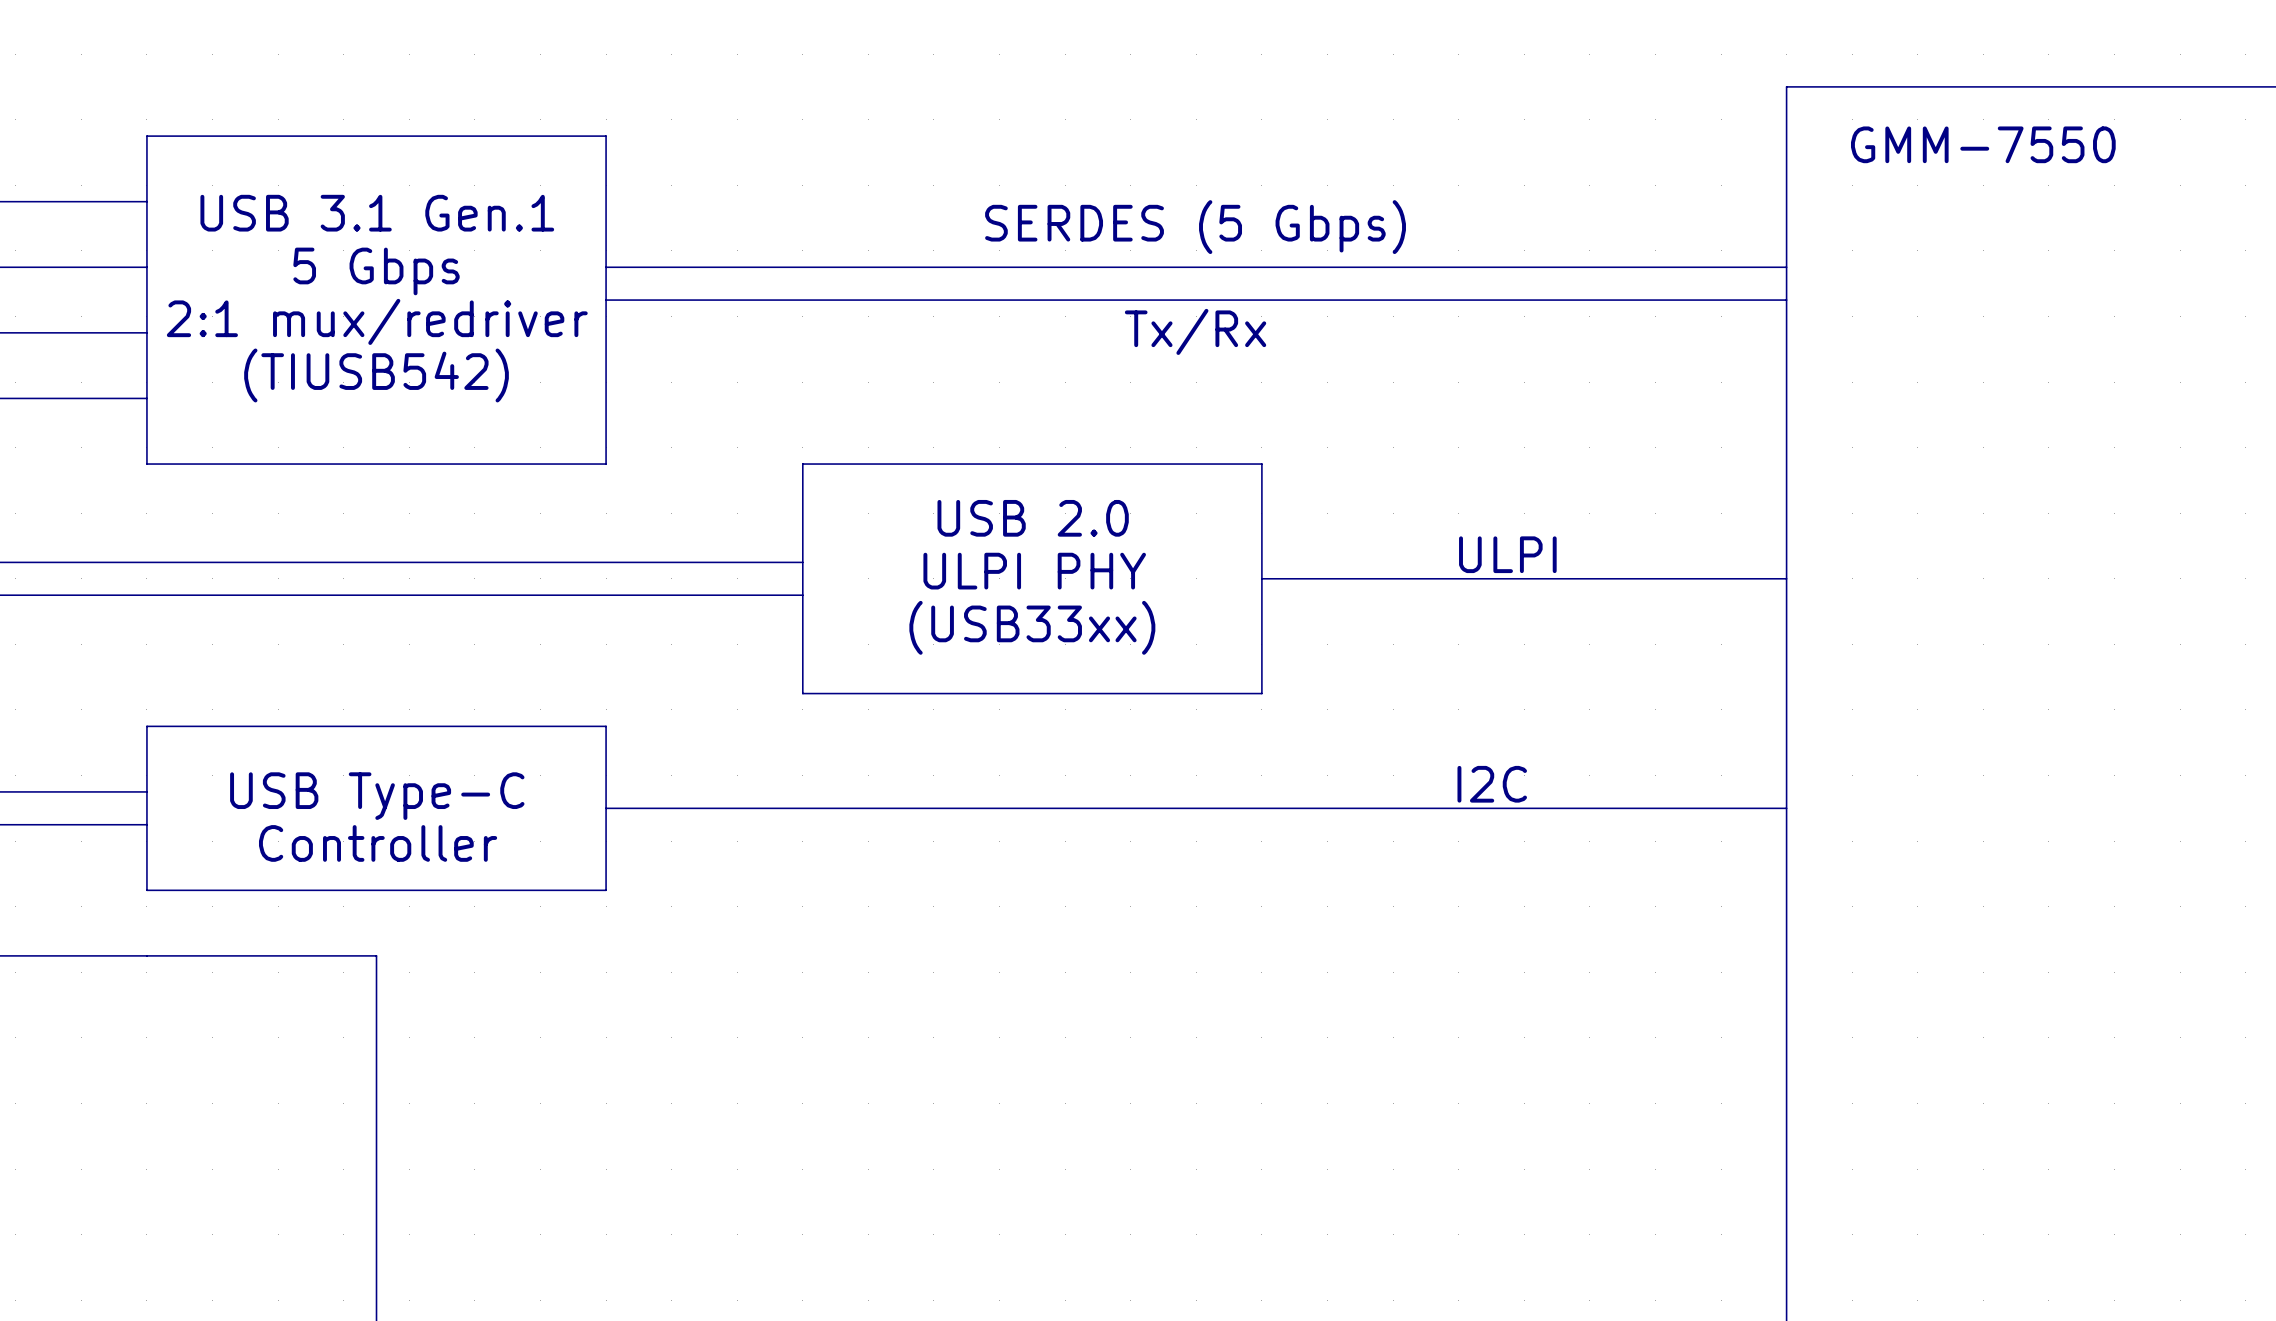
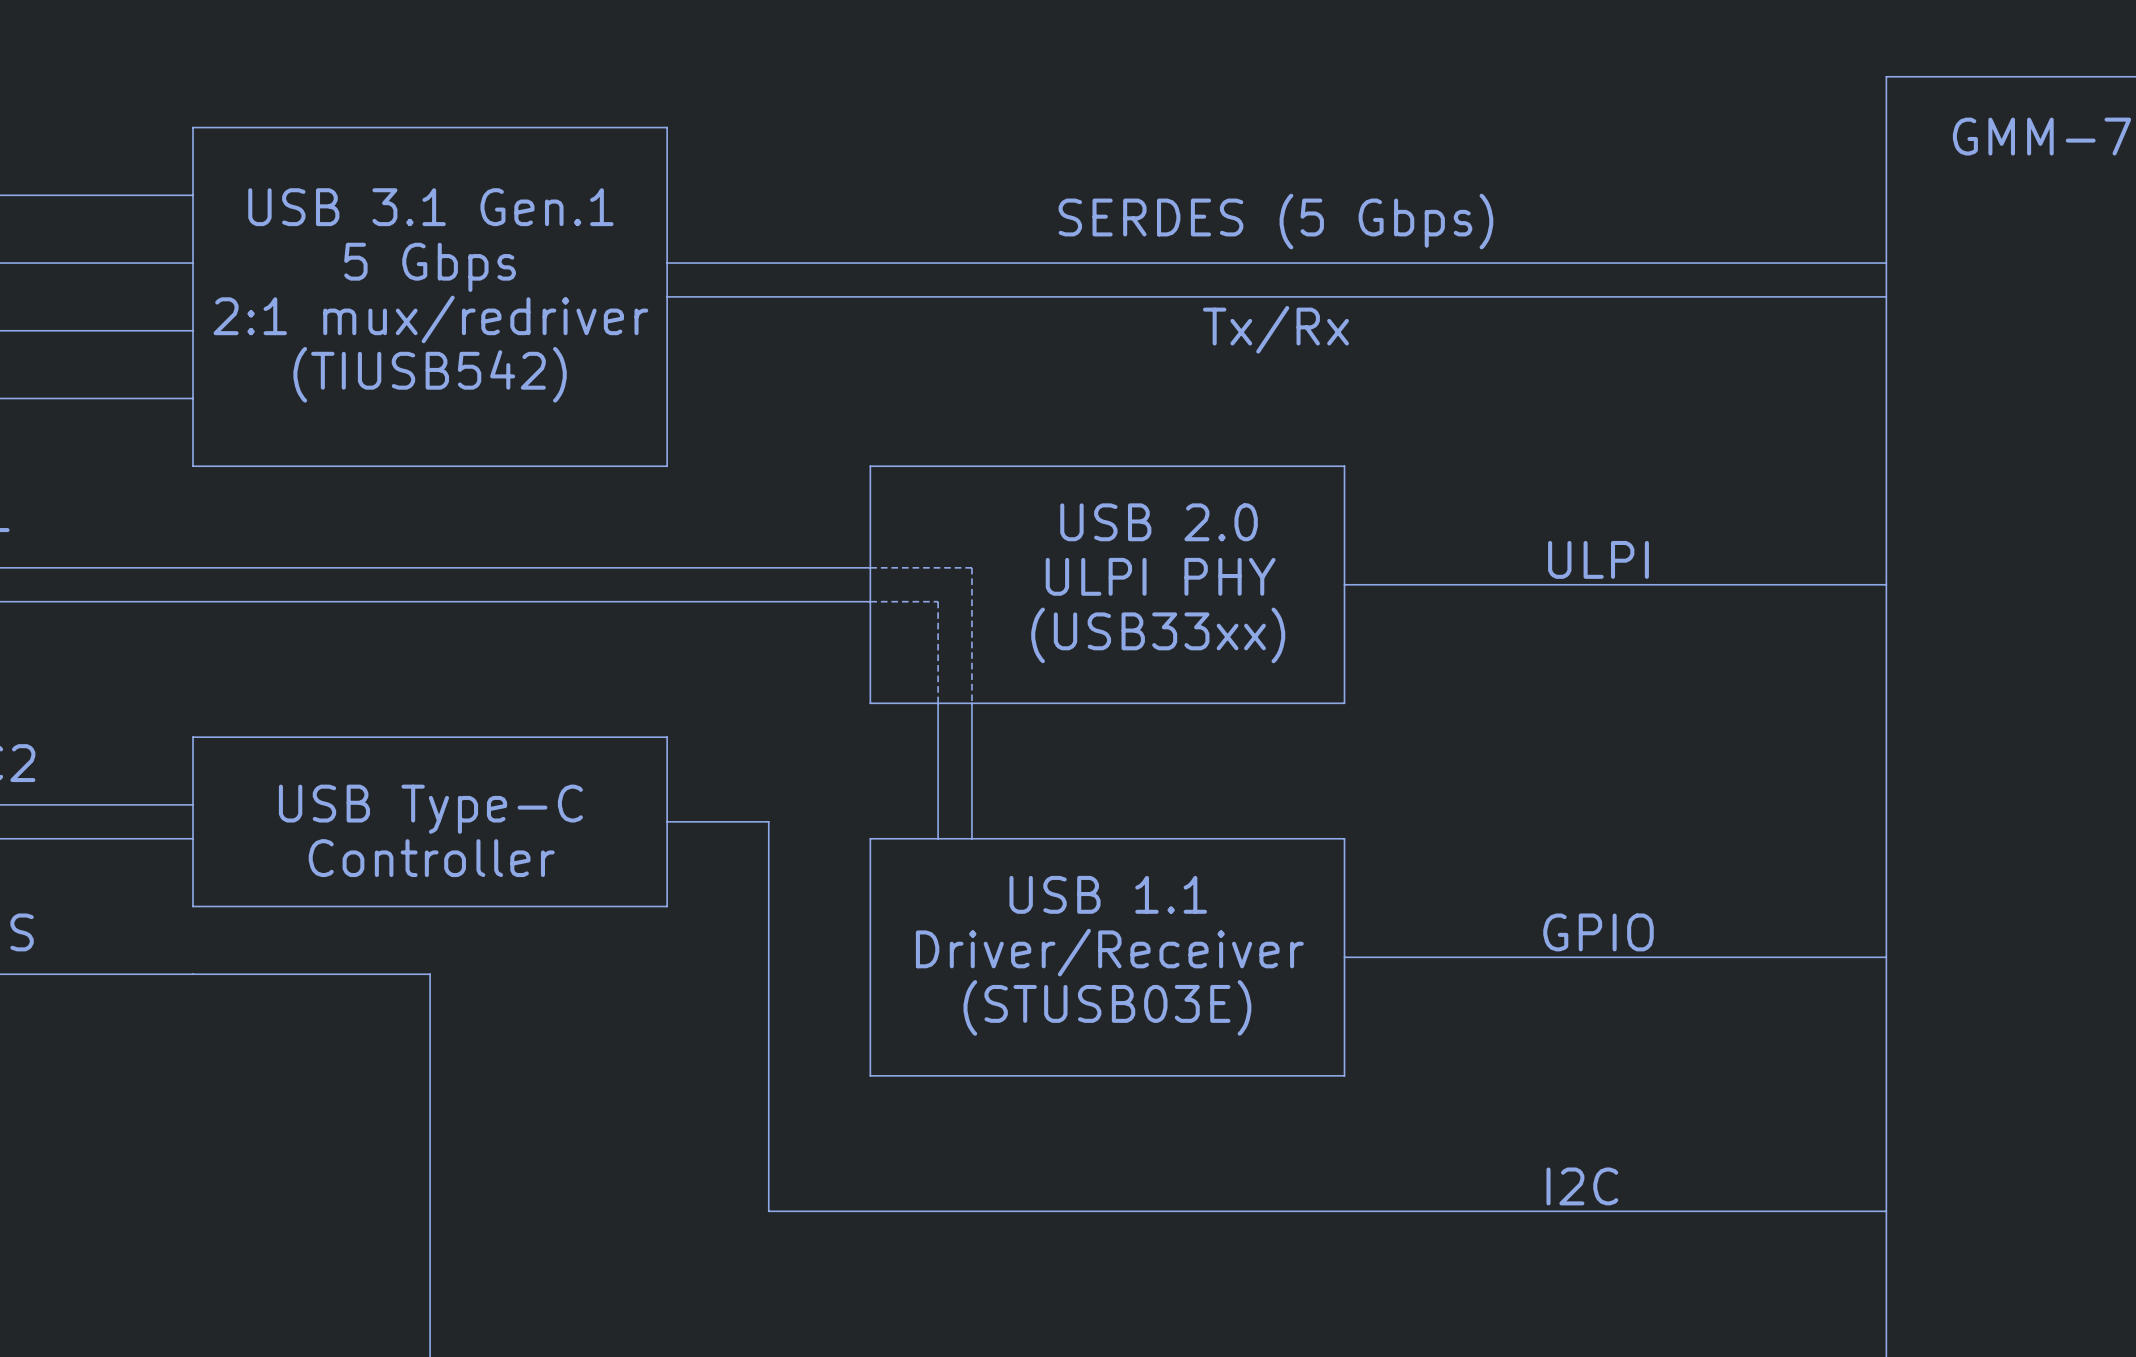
text position: USB 2.0 (1033, 518) -> USB 2.0 (1159, 522)
line: none -> (870, 567) (971, 567) (971, 838)
text position: ULPI PHY (1034, 571) -> ULPI PHY (1160, 576)
line: none -> (870, 601) (938, 601) (938, 838)
text position: (USB33xx) (1032, 627) -> (USB33xx) (1158, 635)
text position: I2C (1492, 784) -> I2C (1582, 1186)
line: (704, 808) (1786, 808) -> (768, 821) (768, 1211) (1886, 1211)
line: none -> (870, 838) (1344, 838) (1344, 1075) (870, 1075) (870, 838)
text: none -> USB 1.1 (1108, 894)
text: none -> GPIO (1598, 932)
text: none -> Driver/Receiver (1109, 952)
line: none -> (1344, 957) (1886, 957)
text: none -> (STUSB03E) (1107, 1007)

